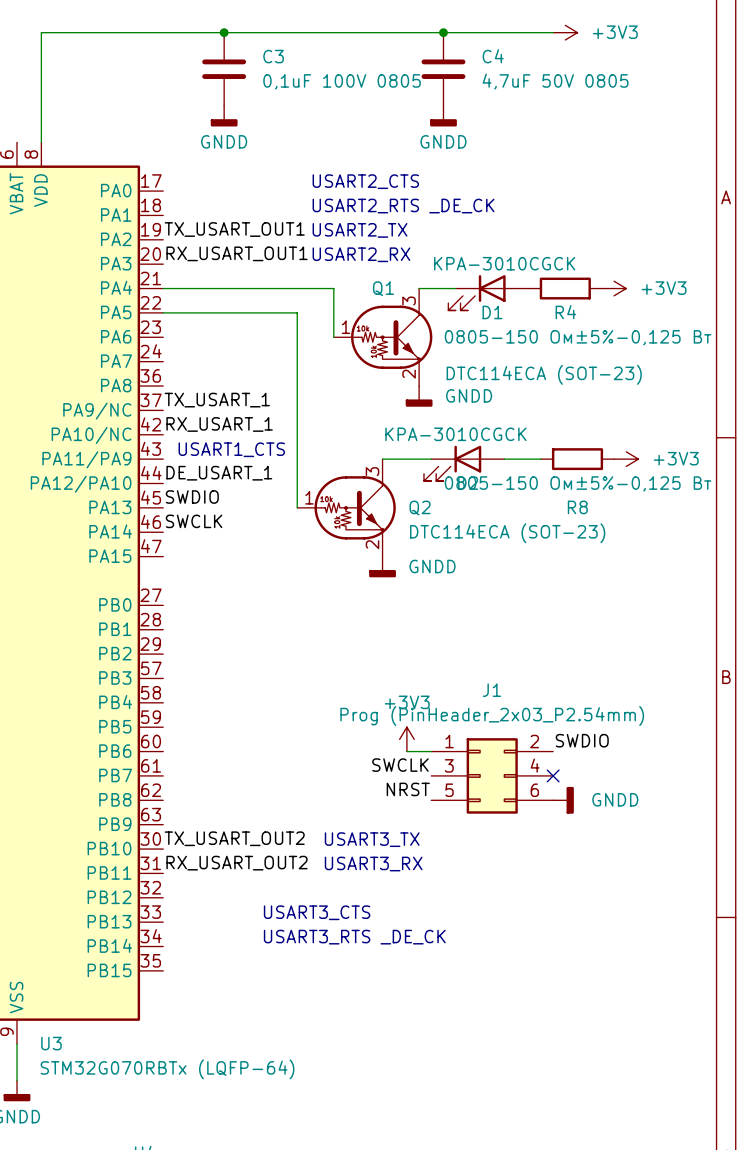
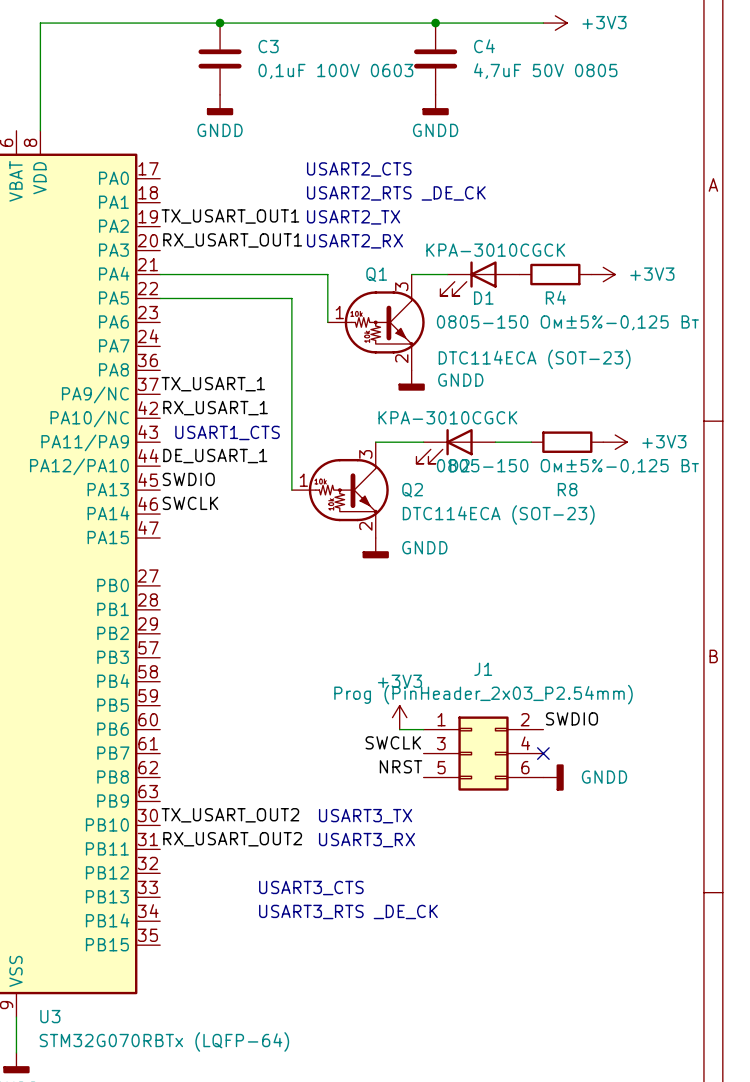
C3 value: 0,1uF 100V 0805 (342, 81) -> 0,1uF 100V 0603 (335, 71)

